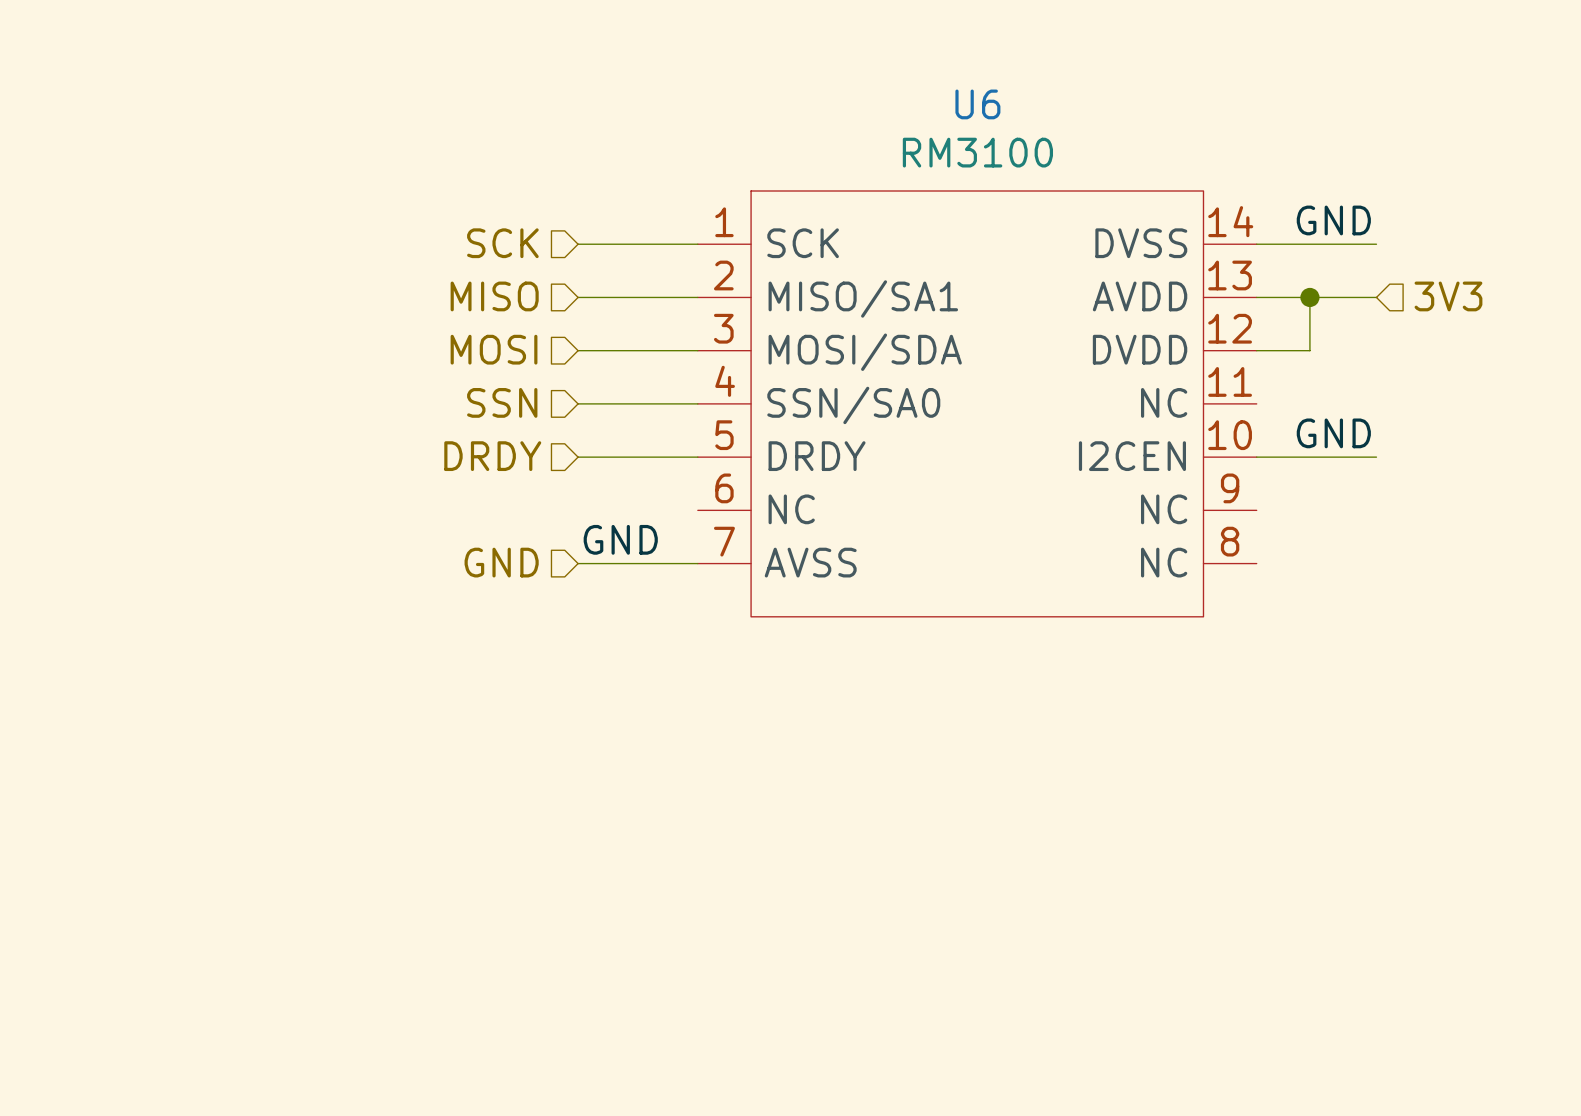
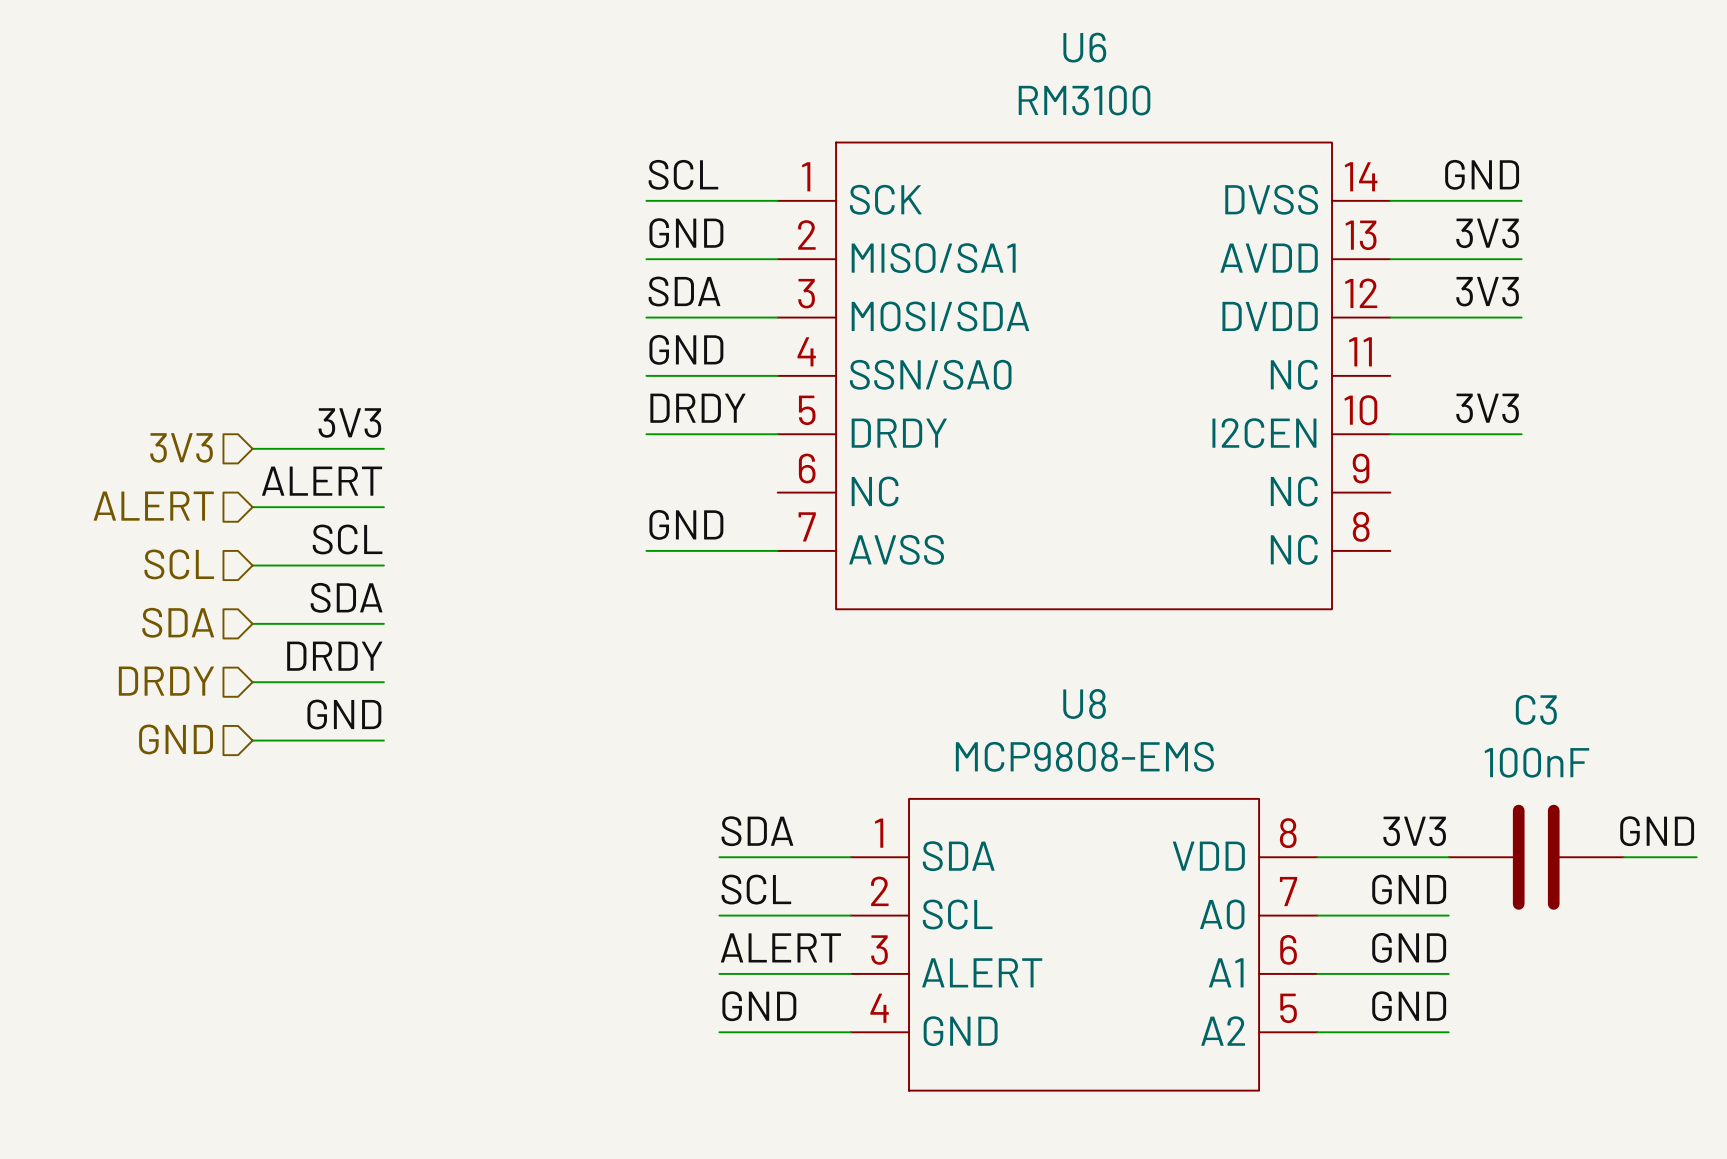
label: none -> SCL (683, 174)
hierarchical label: SCK (502, 243) -> none
label: none -> GND (686, 233)
label: none -> 3V3 (1487, 233)
hierarchical label: MISO (494, 296) -> none
hierarchical label: 3V3 (1448, 296) -> none
wire: (1309, 297) (1309, 350) -> (1521, 317) (1448, 317)
junction: (1309, 297) -> none
label: none -> SDA (684, 291)
label: none -> 3V3 (1487, 291)
hierarchical label: MOSI (494, 349) -> none
label: none -> GND (686, 349)
hierarchical label: SSN (502, 402) -> none
label: none -> DRDY (697, 408)
label: GND (1333, 433) -> 3V3 (1487, 408)
label: none -> 3V3 (349, 422)
hierarchical label position: DRDY (492, 456) -> DRDY (166, 681)
hierarchical label: none -> 3V3 (181, 447)
wire: none -> (252, 448) (383, 448)
label: none -> ALERT (321, 481)
hierarchical label: none -> ALERT (153, 506)
wire: none -> (252, 507) (383, 507)
label: none -> SCL (347, 539)
hierarchical label position: GND (501, 562) -> GND (176, 739)
hierarchical label: none -> SCL (179, 564)
wire: none -> (252, 565) (383, 565)
label: none -> SDA (346, 597)
hierarchical label: none -> SDA (178, 622)
wire: none -> (252, 623) (383, 623)
label: none -> DRDY (334, 656)
wire: none -> (252, 682) (383, 682)
label: none -> GND (344, 714)
wire: none -> (252, 740) (383, 740)
label: none -> SDA (757, 831)
label: none -> 3V3 (1414, 831)
label: none -> GND (1657, 831)
wire: none -> (719, 857) (850, 857)
wire: none -> (1317, 857) (1448, 857)
C3: none -> 100nF (1536, 857)
wire: none -> (1623, 857) (1696, 857)
label: none -> SCL (756, 889)
label: none -> GND (1409, 889)
wire: none -> (719, 915) (850, 915)
wire: none -> (1317, 915) (1448, 915)
U8: none -> MCP9808-EMS (1084, 944)
label: none -> ALERT (780, 947)
label: none -> GND (1409, 947)
wire: none -> (719, 973) (850, 973)
wire: none -> (1317, 973) (1448, 973)
label: none -> GND (759, 1006)
label: none -> GND (1409, 1006)
wire: none -> (719, 1032) (850, 1032)
wire: none -> (1317, 1032) (1448, 1032)

